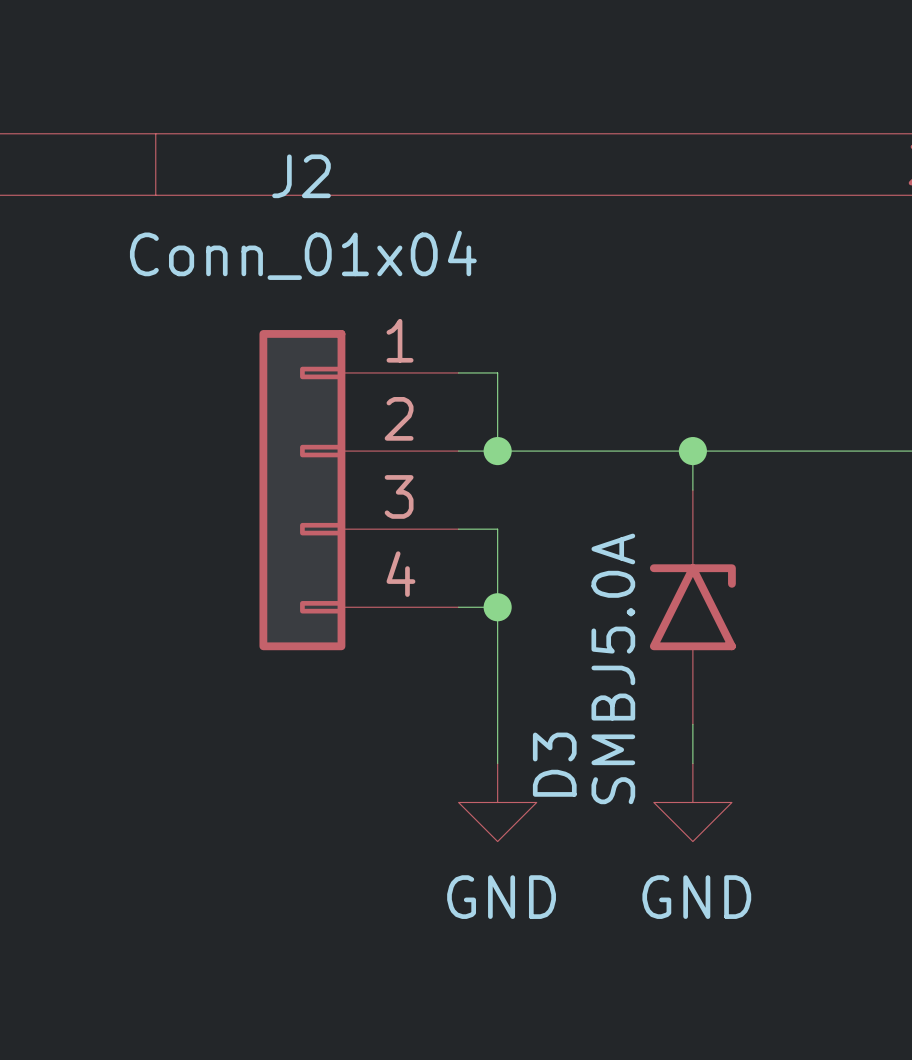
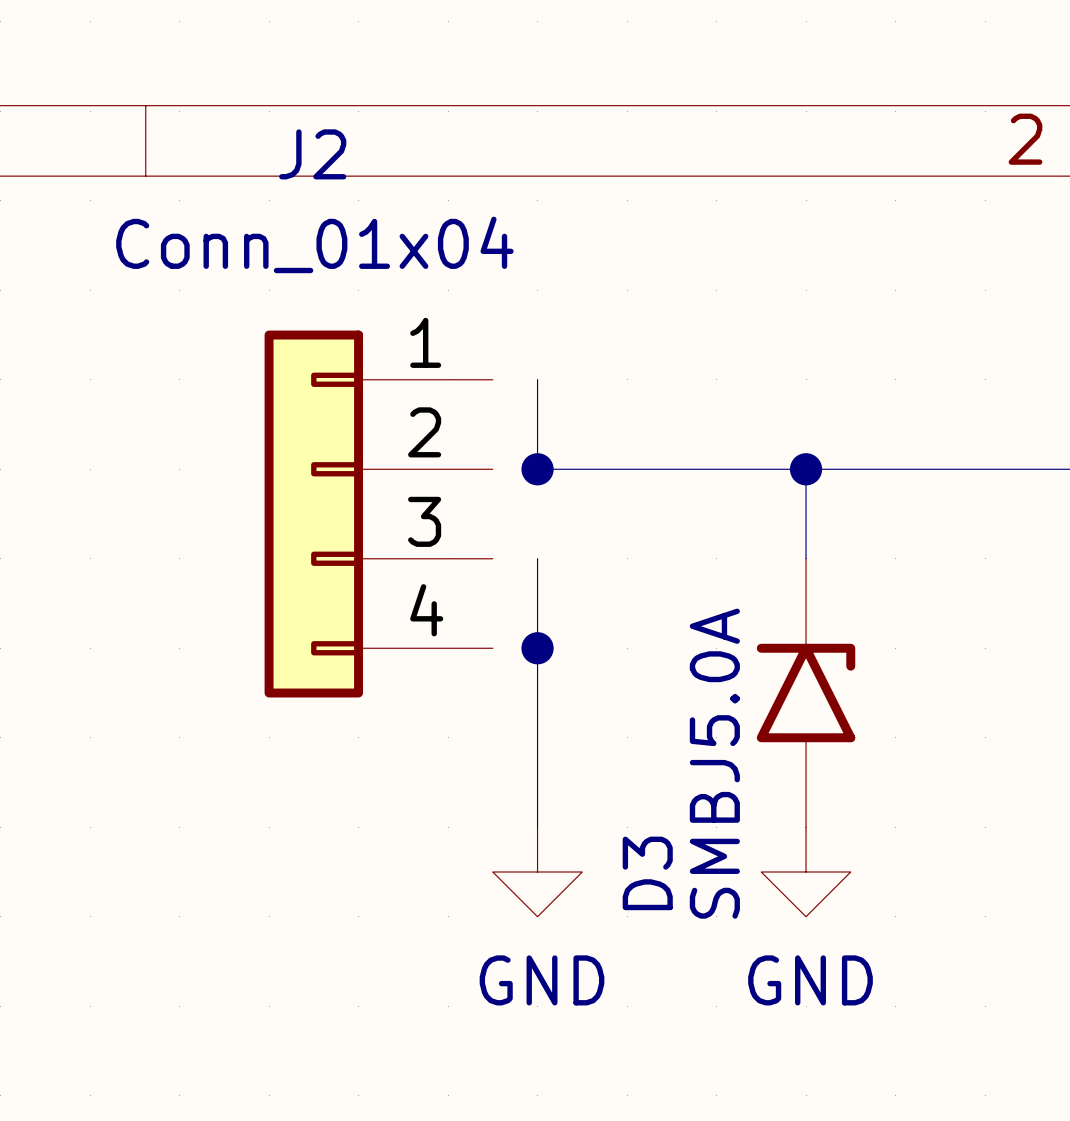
wire: (458, 372) (497, 372) -> none
wire: (458, 451) (497, 451) -> none
wire: (692, 451) (692, 490) -> none
junction position: (692, 451) -> (806, 469)
wire: none -> (806, 469) (806, 558)
wire: (458, 529) (497, 529) -> none
wire: (458, 607) (497, 607) -> none
D3 position: (692, 607) -> (806, 693)
wire: (692, 724) (692, 763) -> none
power symbol position: GND (692, 802) -> GND (806, 871)

